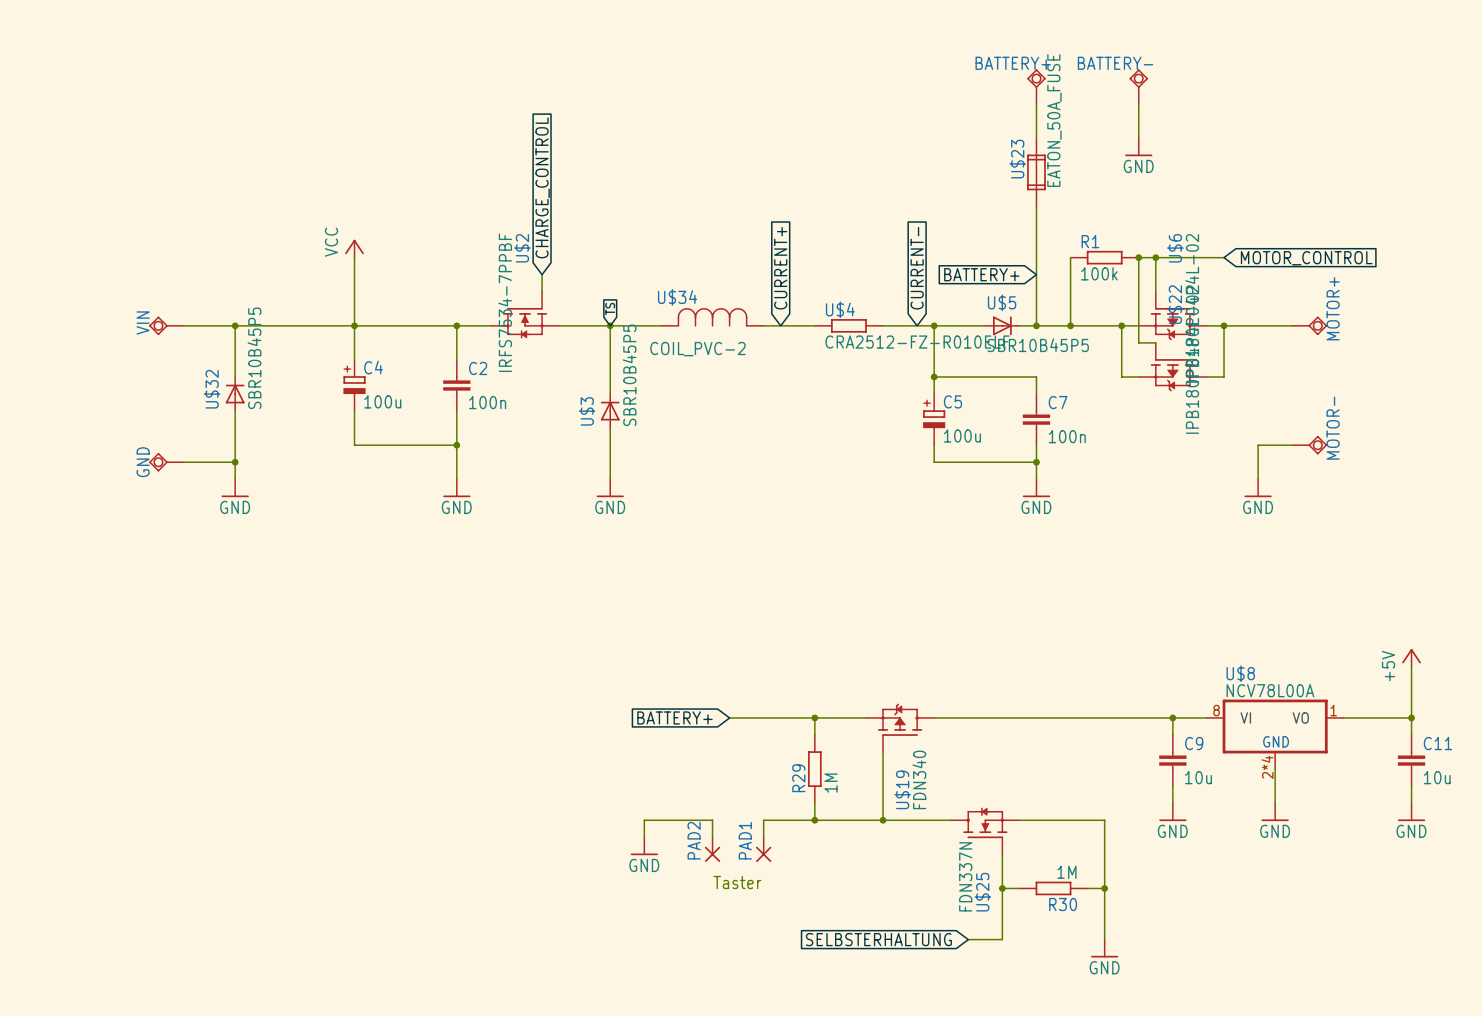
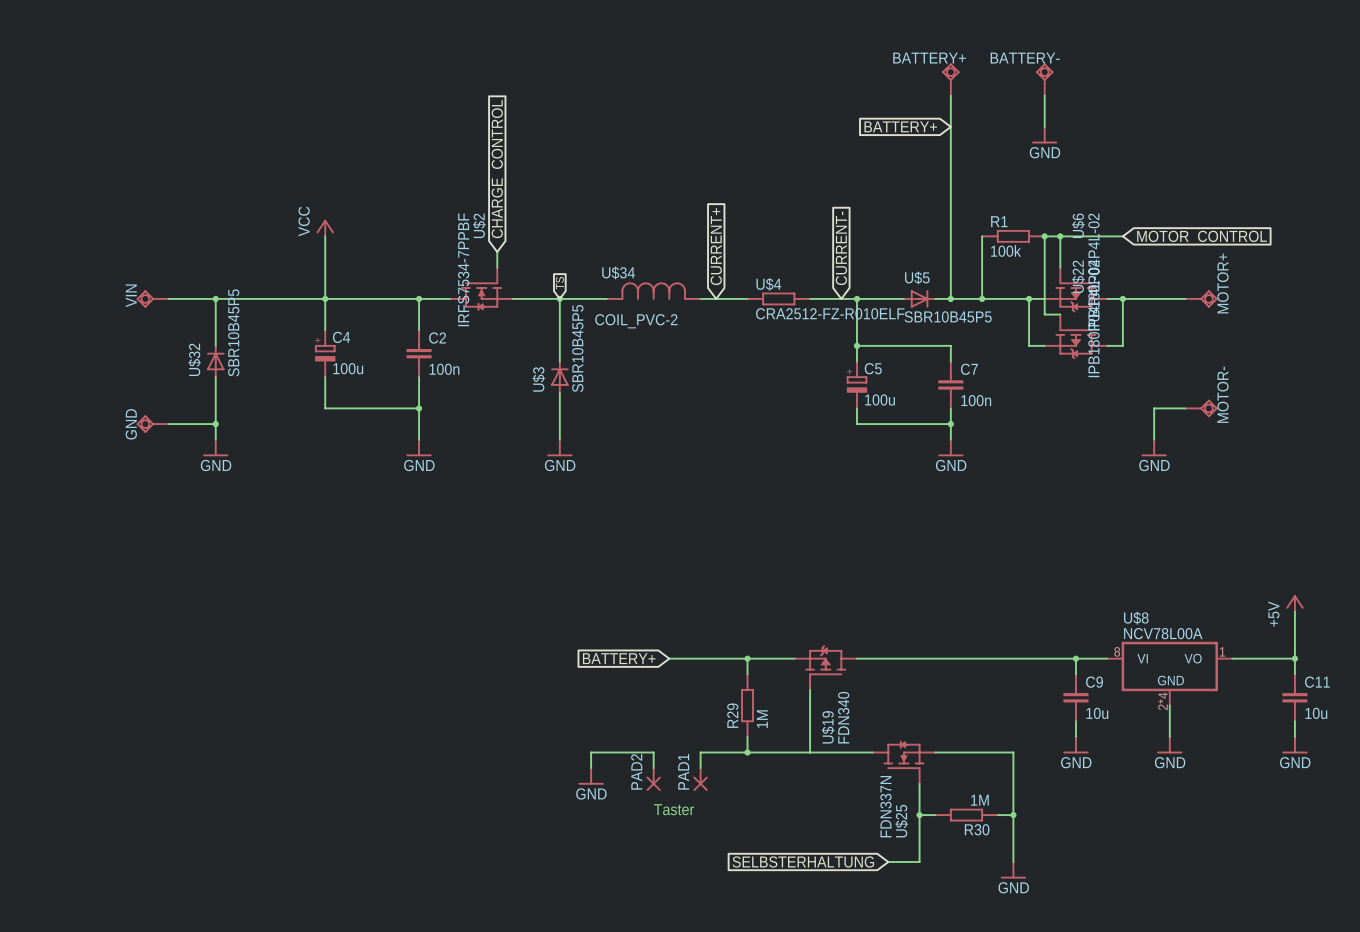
U$23: EATON_50A_FUSE (1036, 172) -> none
global label position: BATTERY+ (981, 274) -> BATTERY+ (900, 126)
junction: (883, 820) -> none

